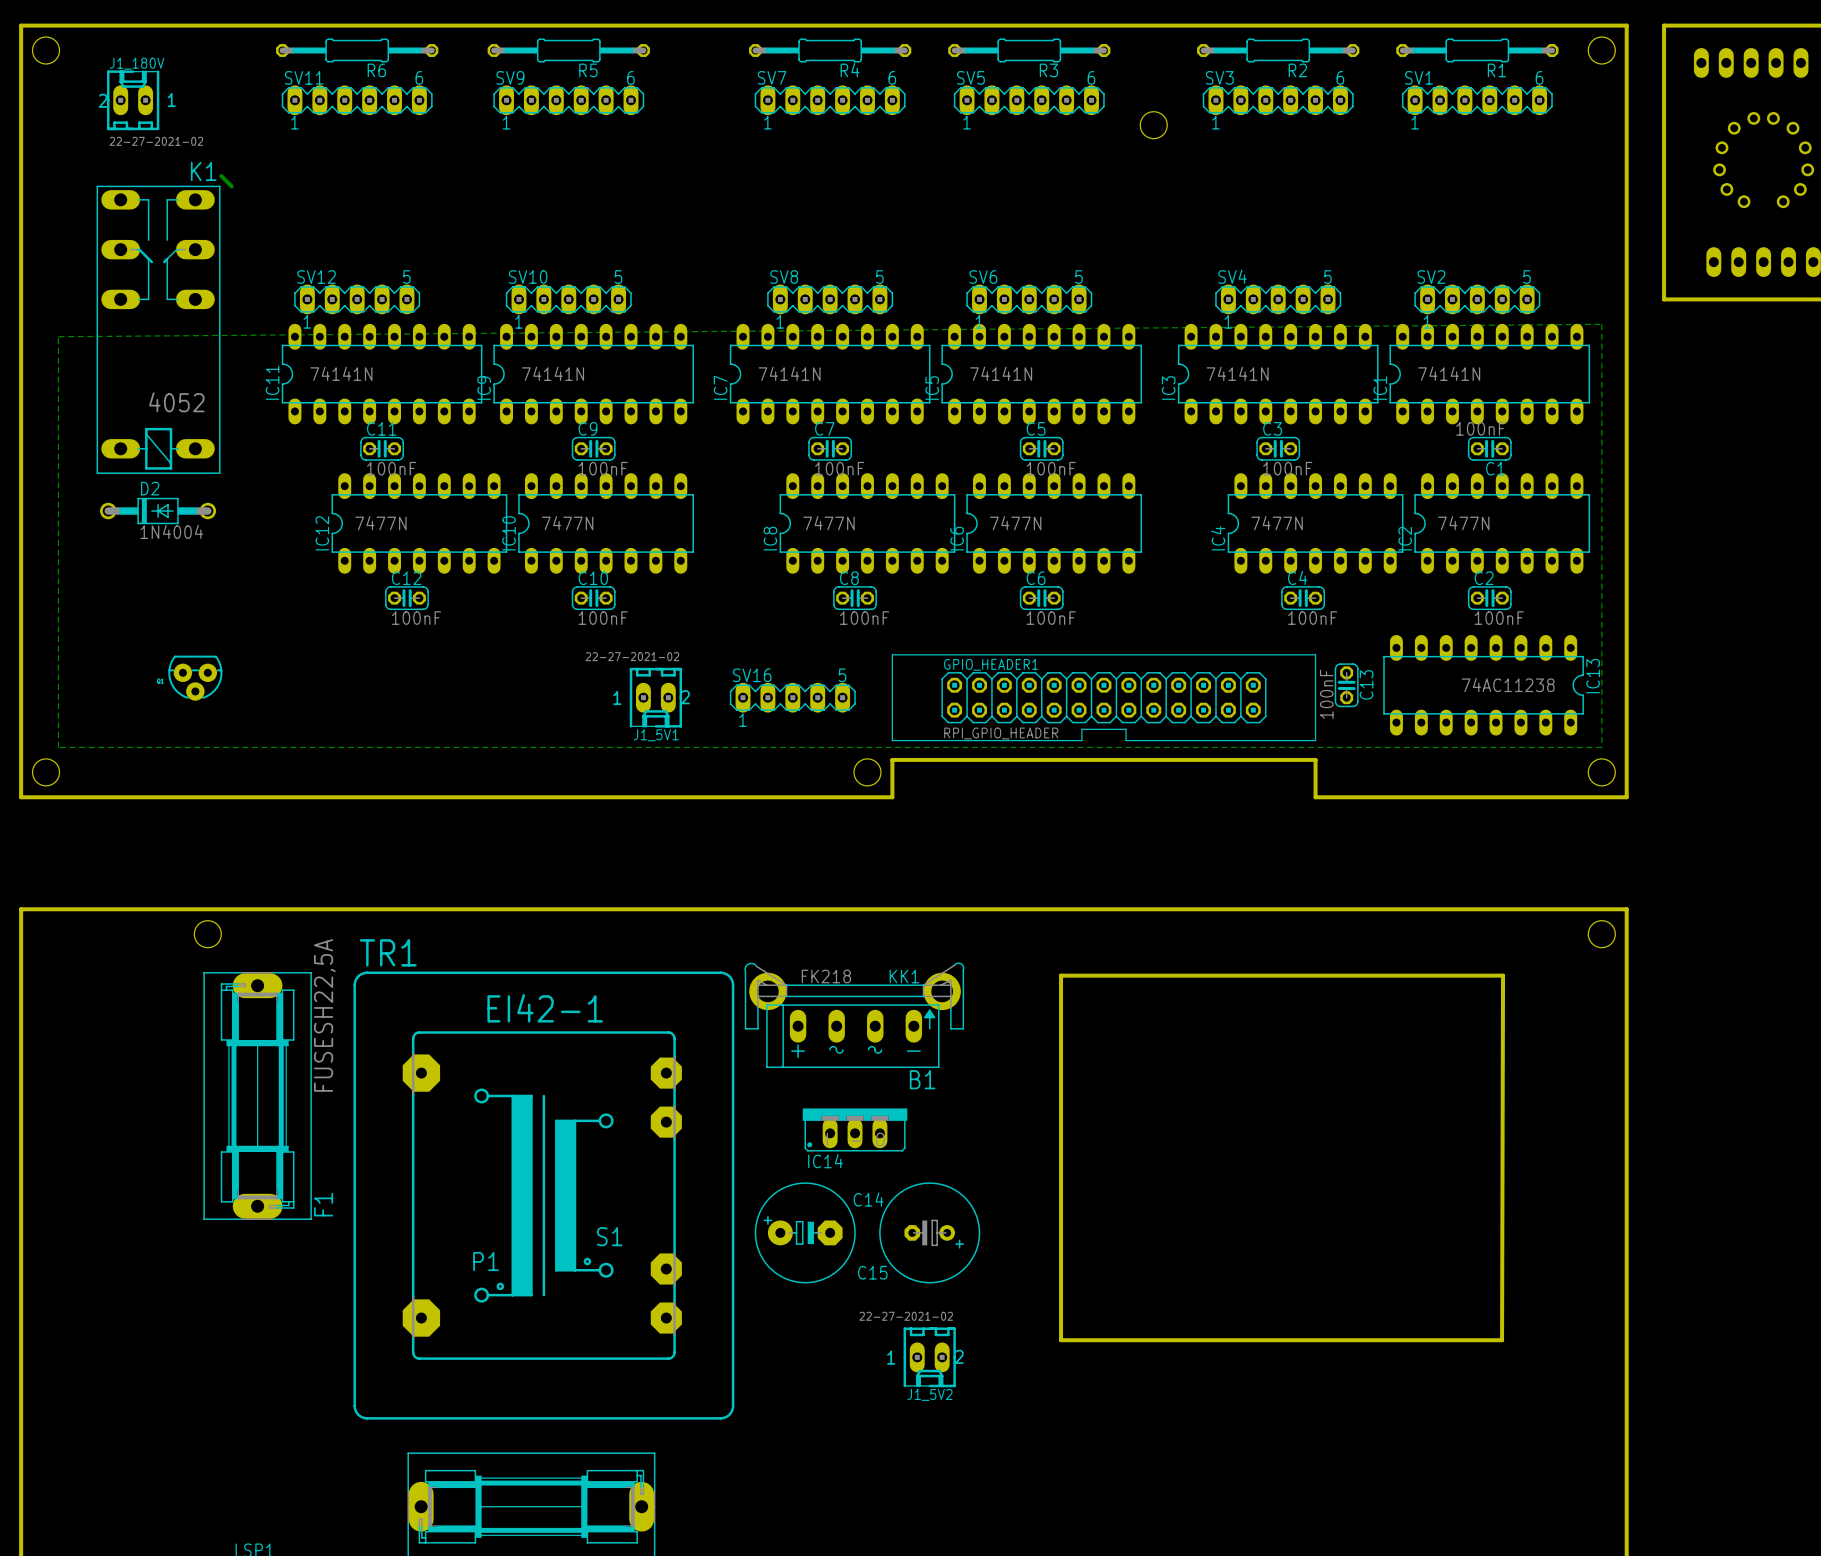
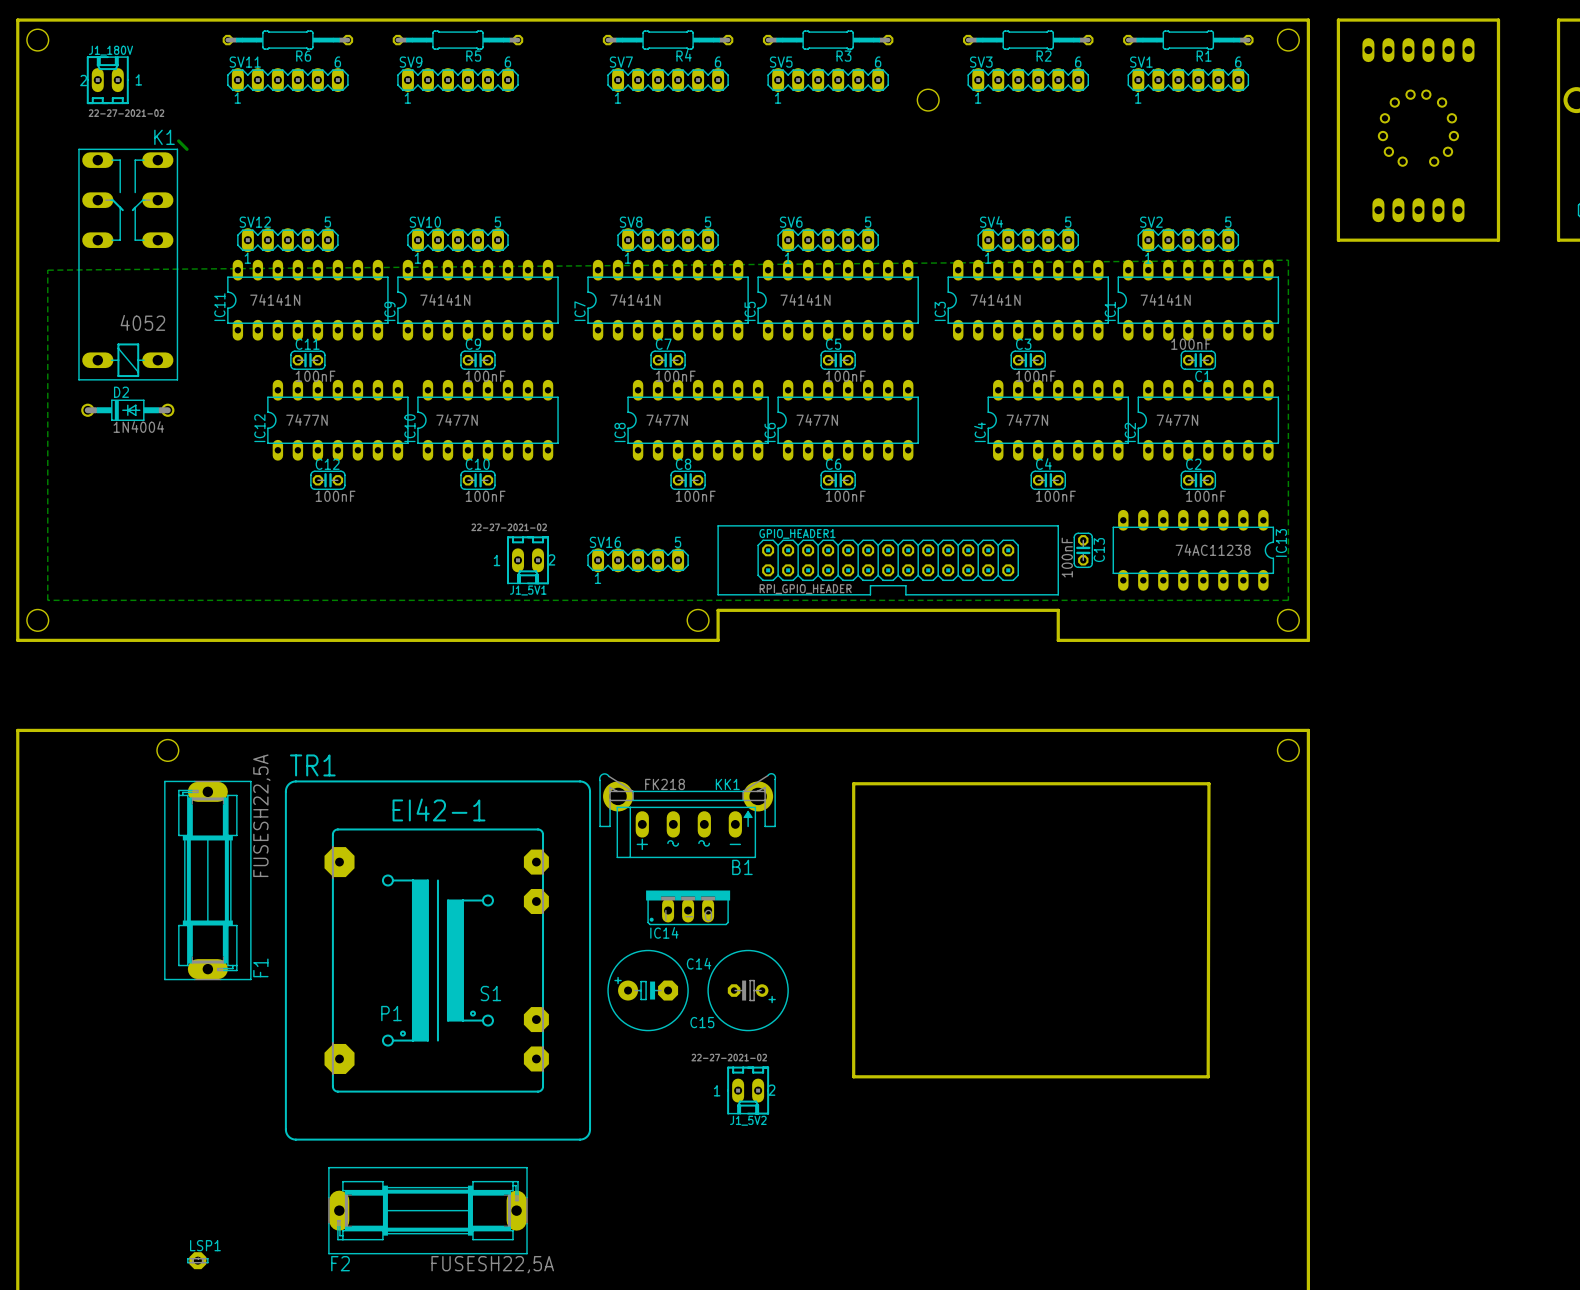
part: (195, 678) -> none

